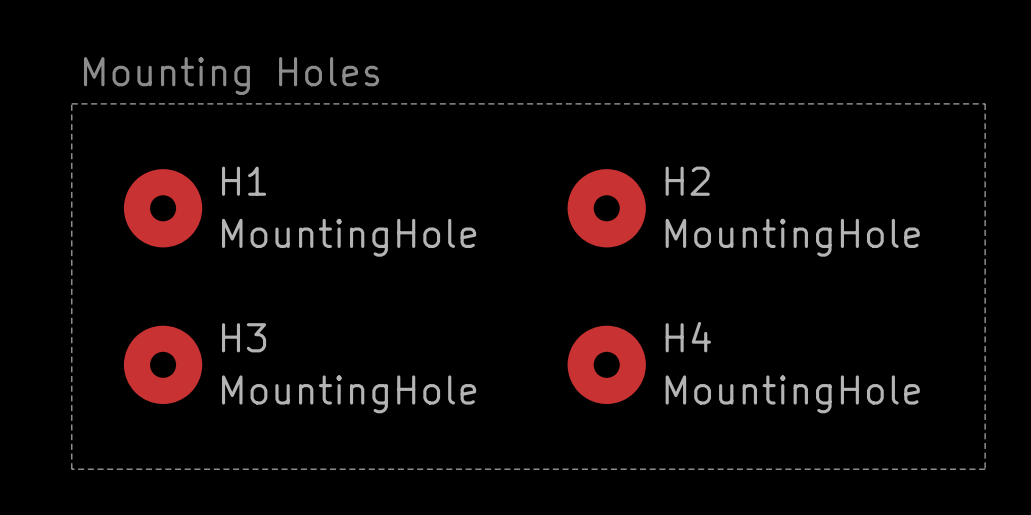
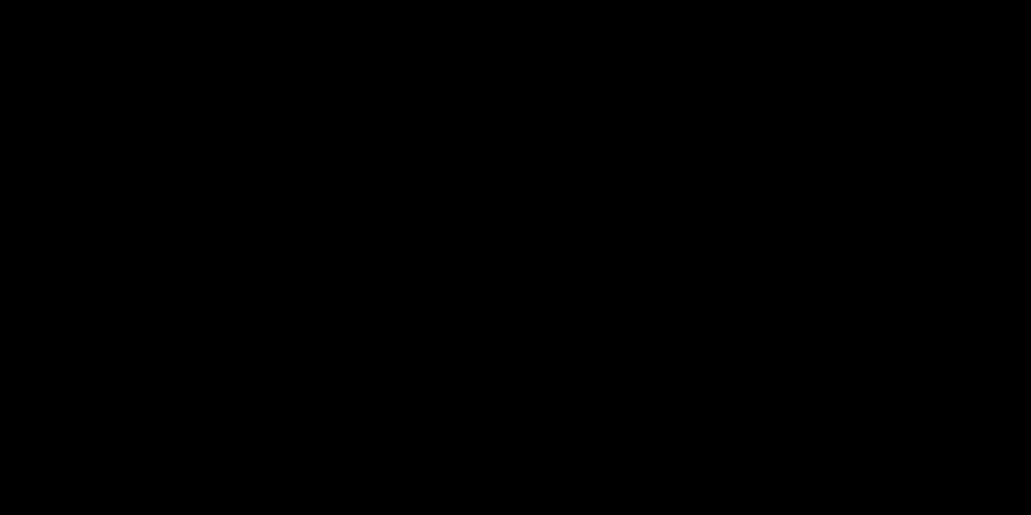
text: Mounting Holes (231, 76) -> none
line: (71, 103) (985, 103) (985, 469) (71, 469) (71, 103) -> none
H1: MountingHole (163, 208) -> none
H2: MountingHole (606, 208) -> none
H3: MountingHole (163, 364) -> none
H4: MountingHole (606, 364) -> none

